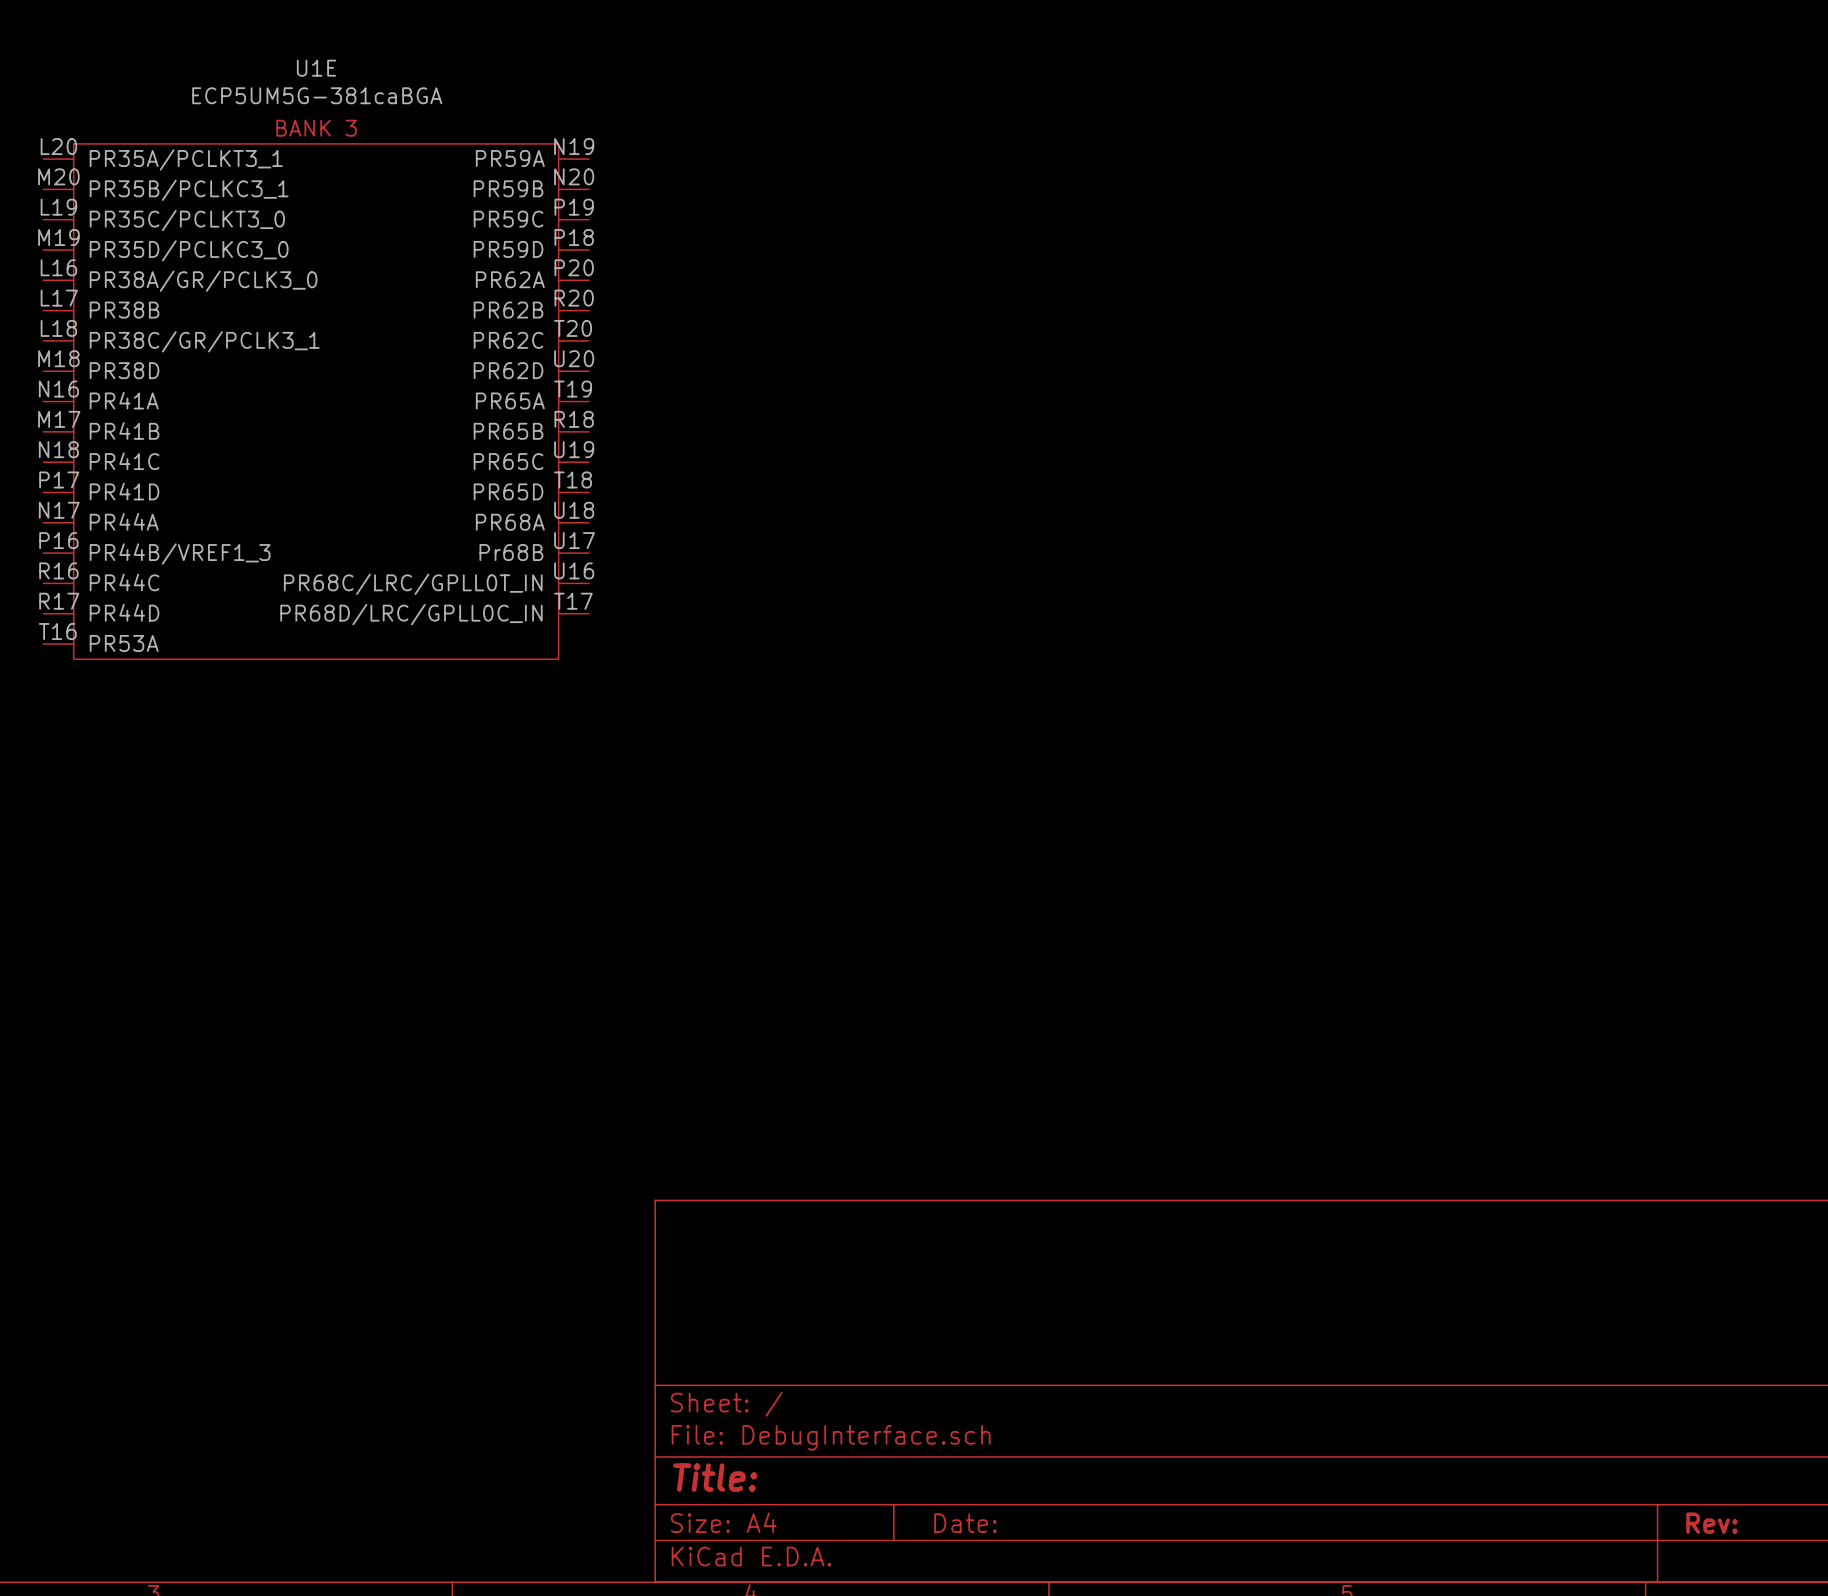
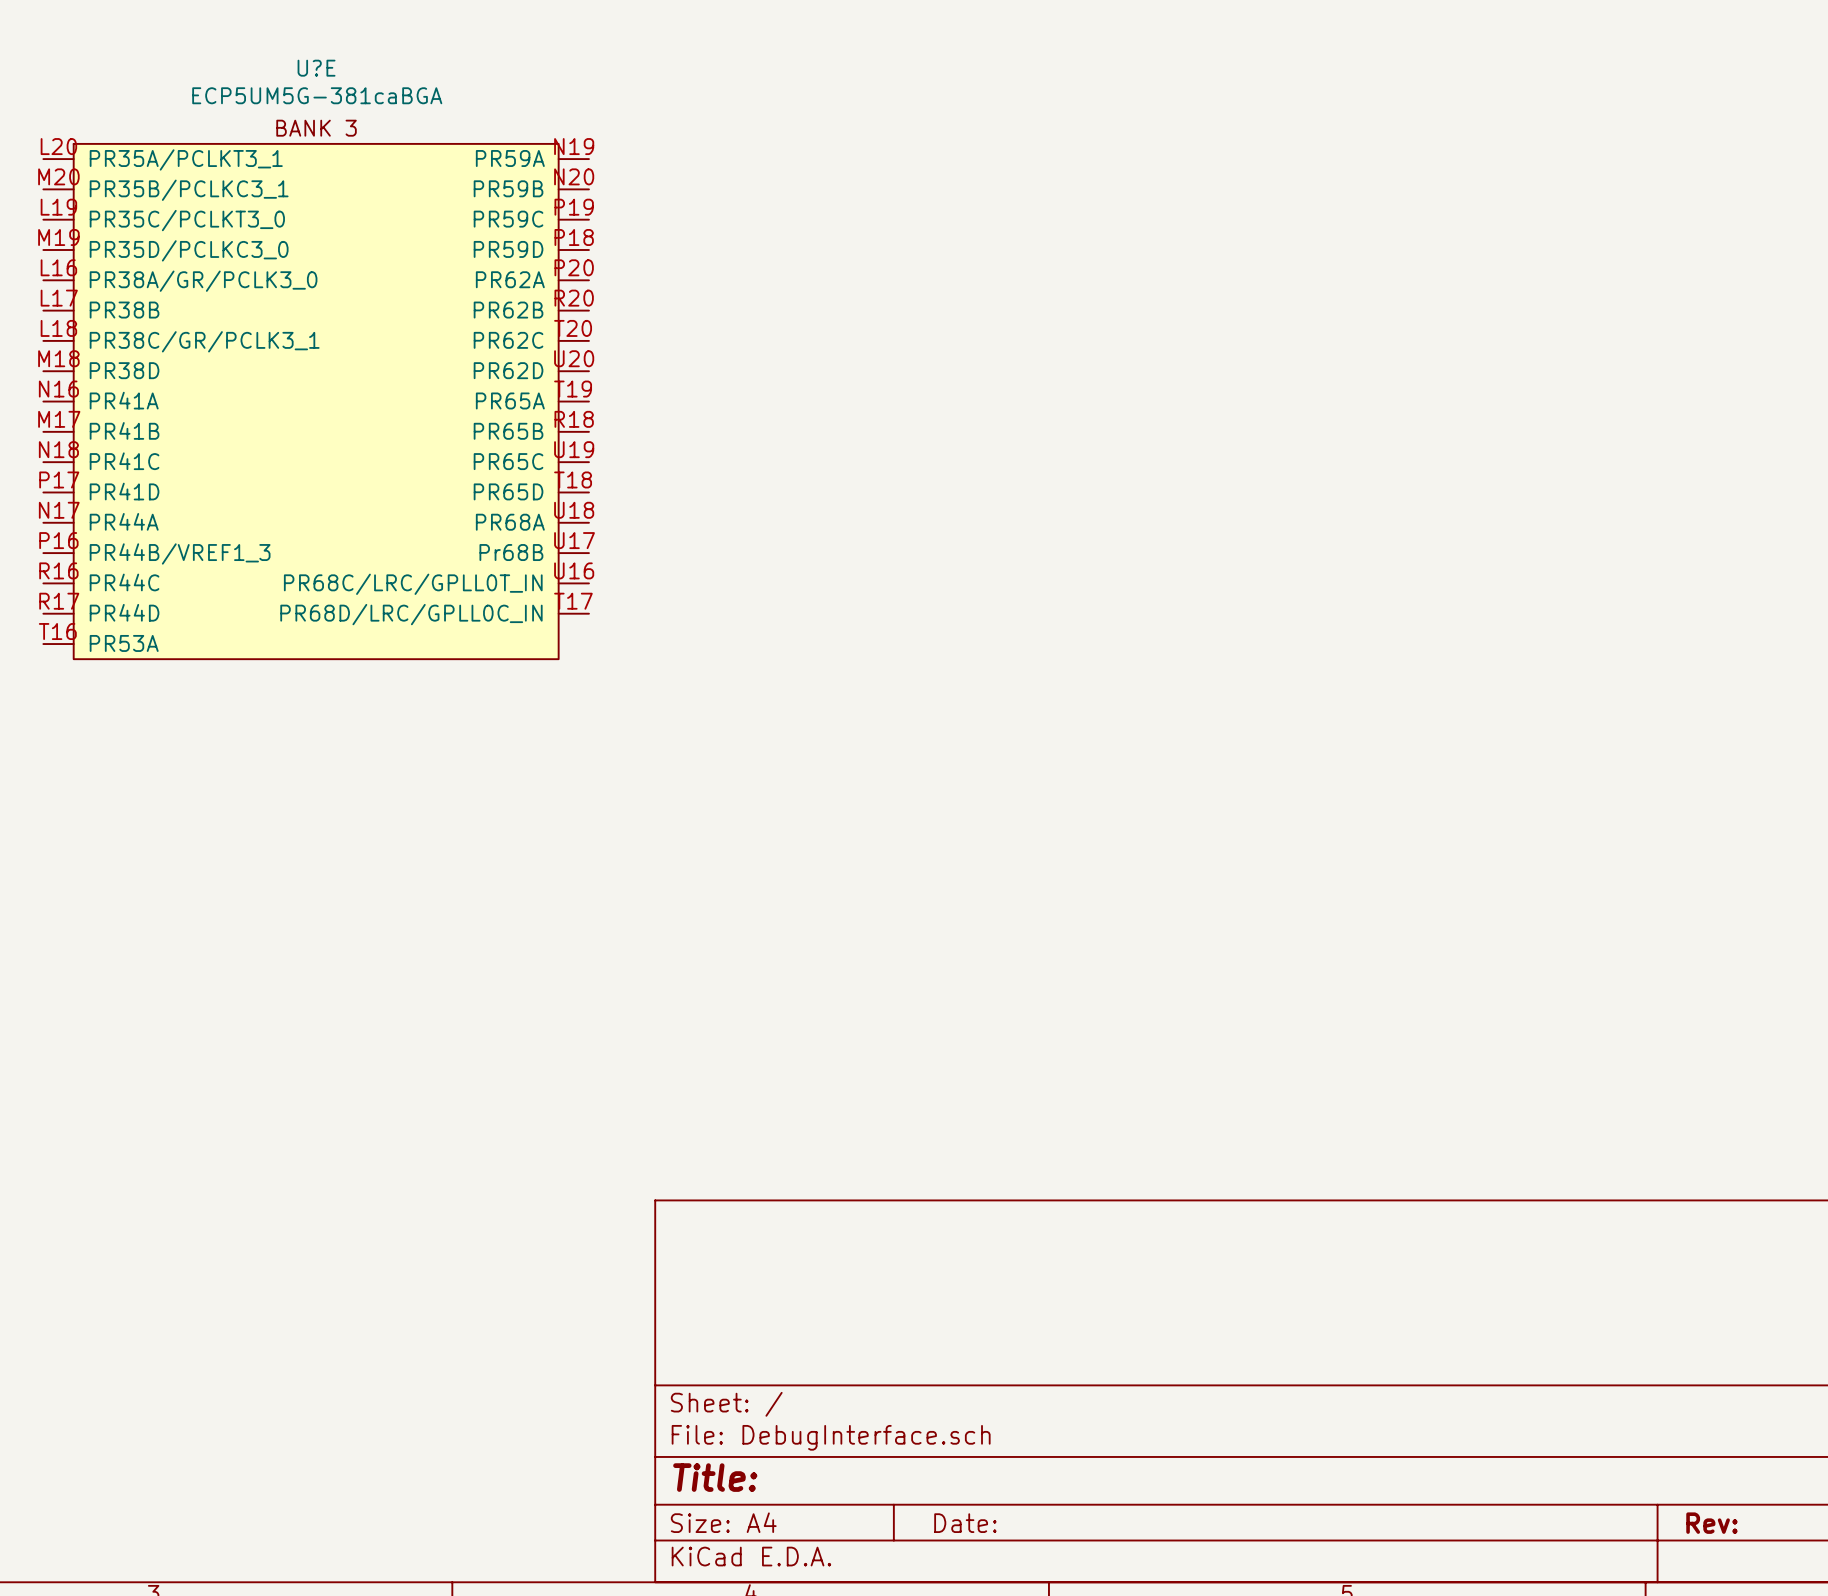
U1E name: U1E (316, 68) -> U?E (316, 68)

